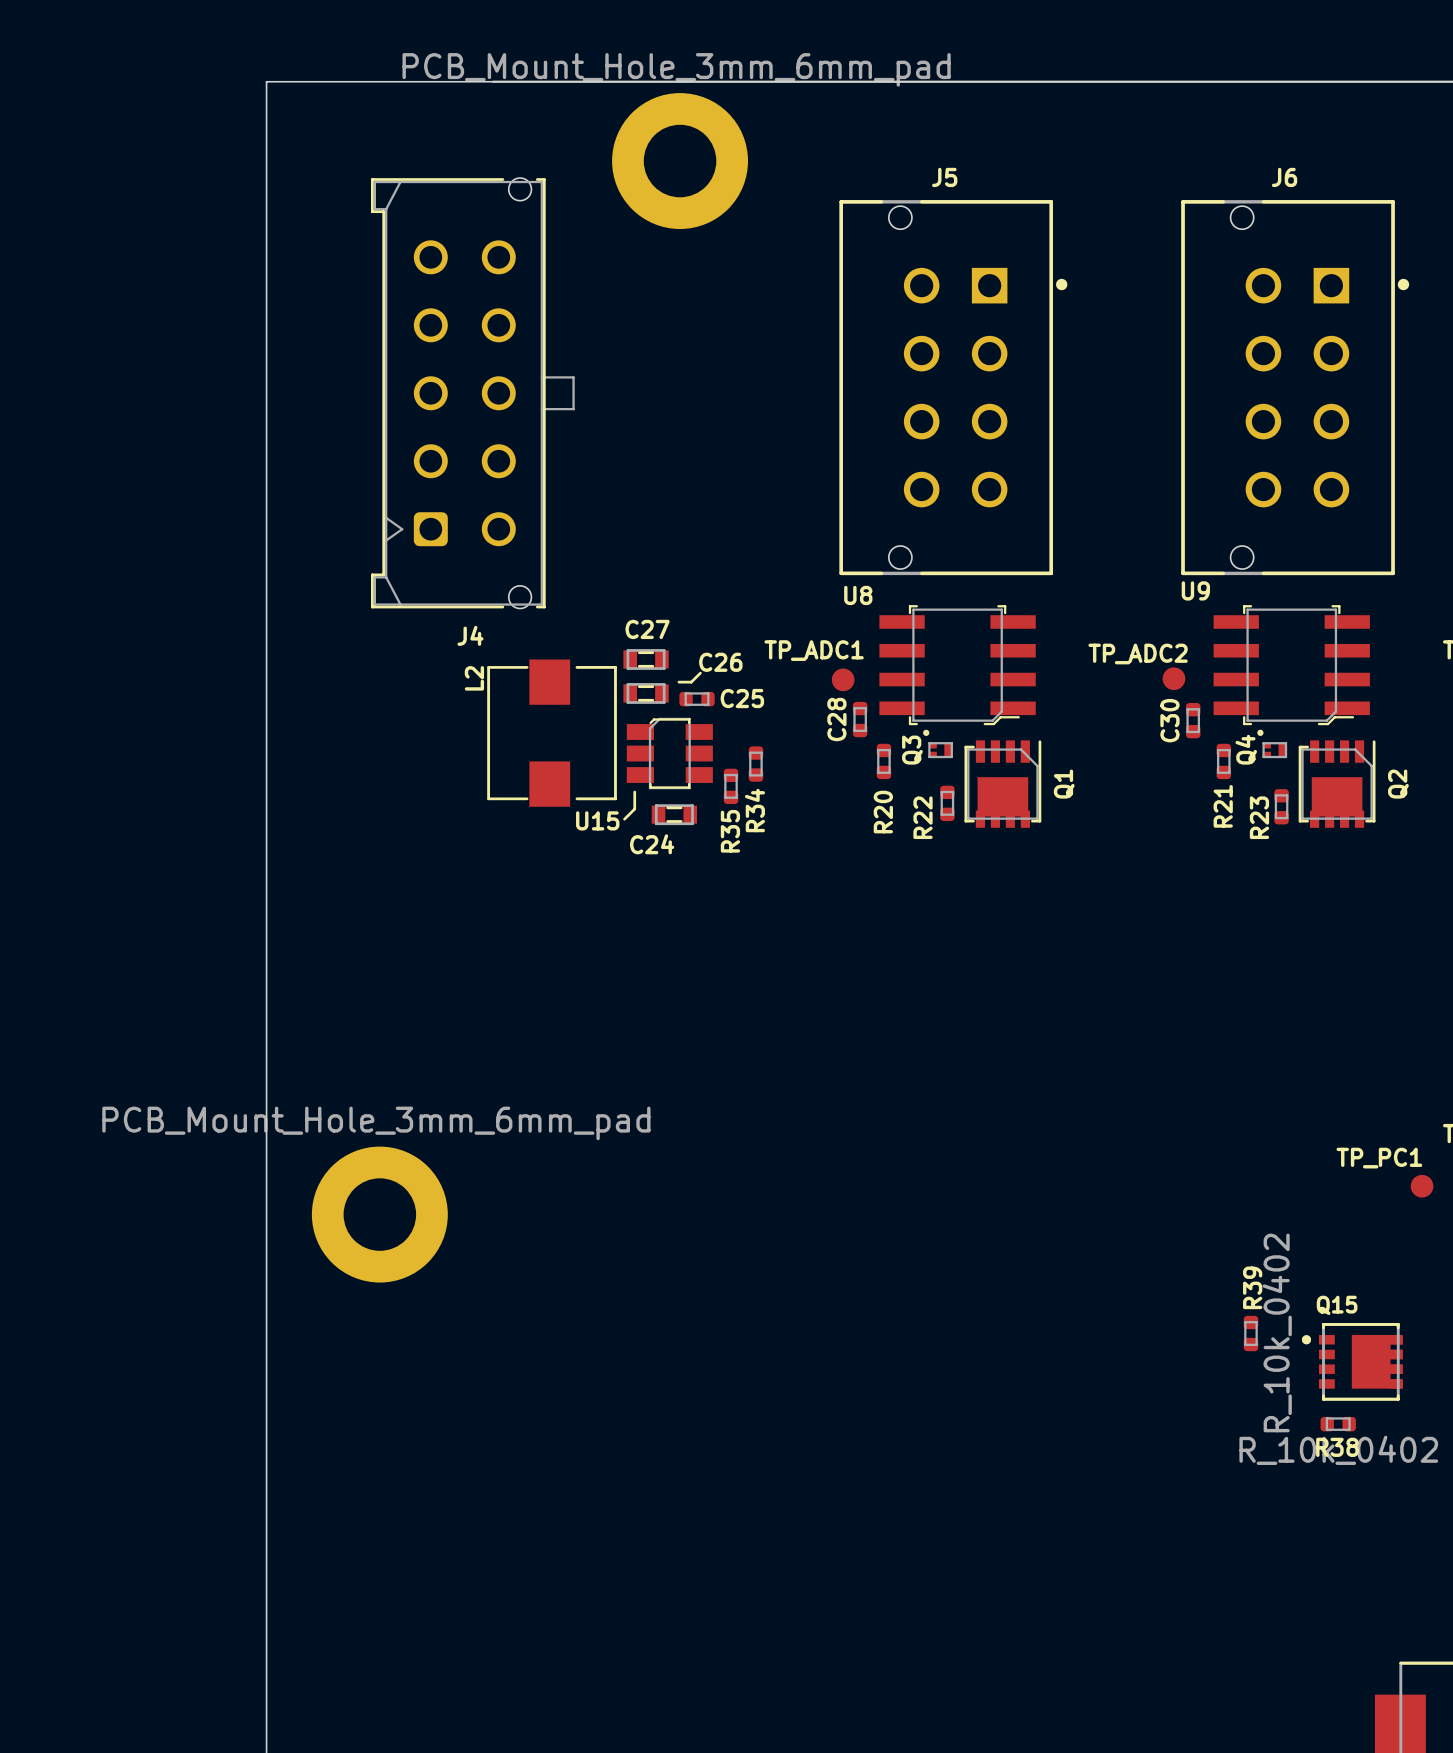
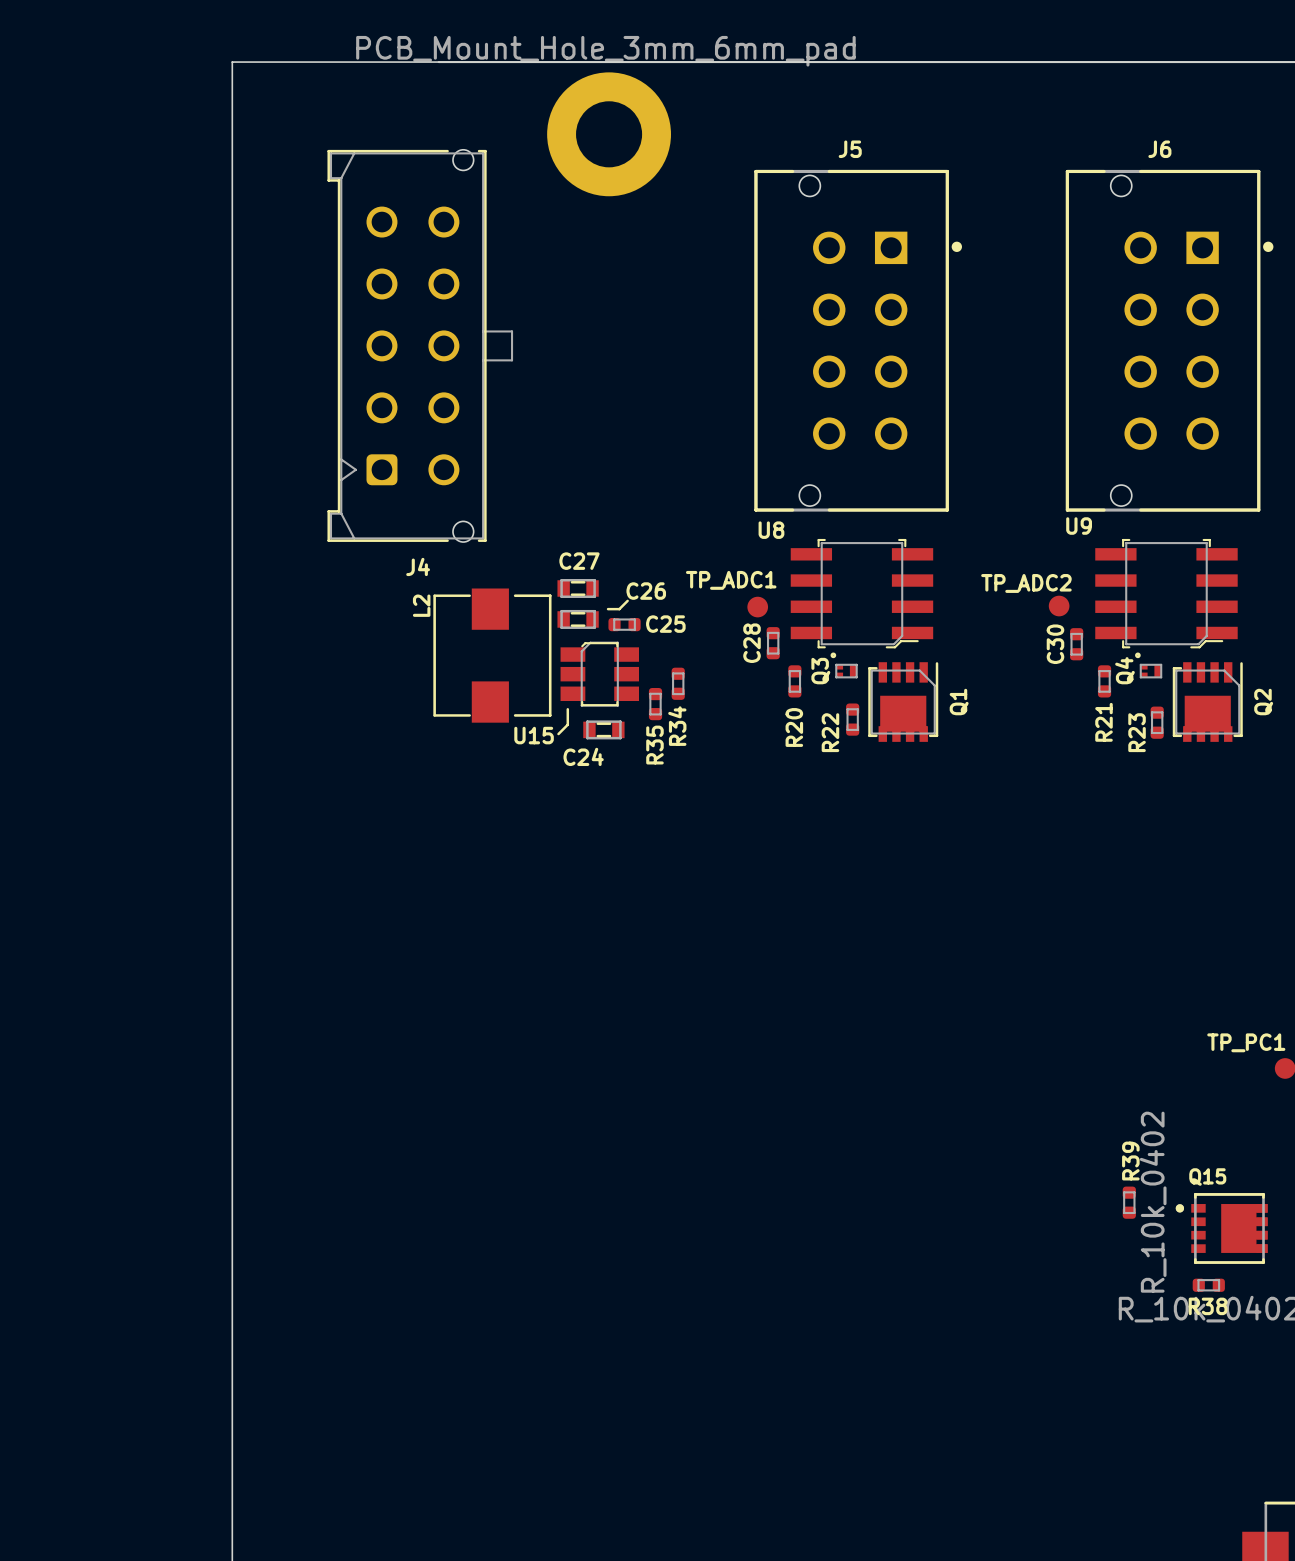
part: PCB_Mount_Hole_3mm_6mm_pad (379, 1214) -> none

